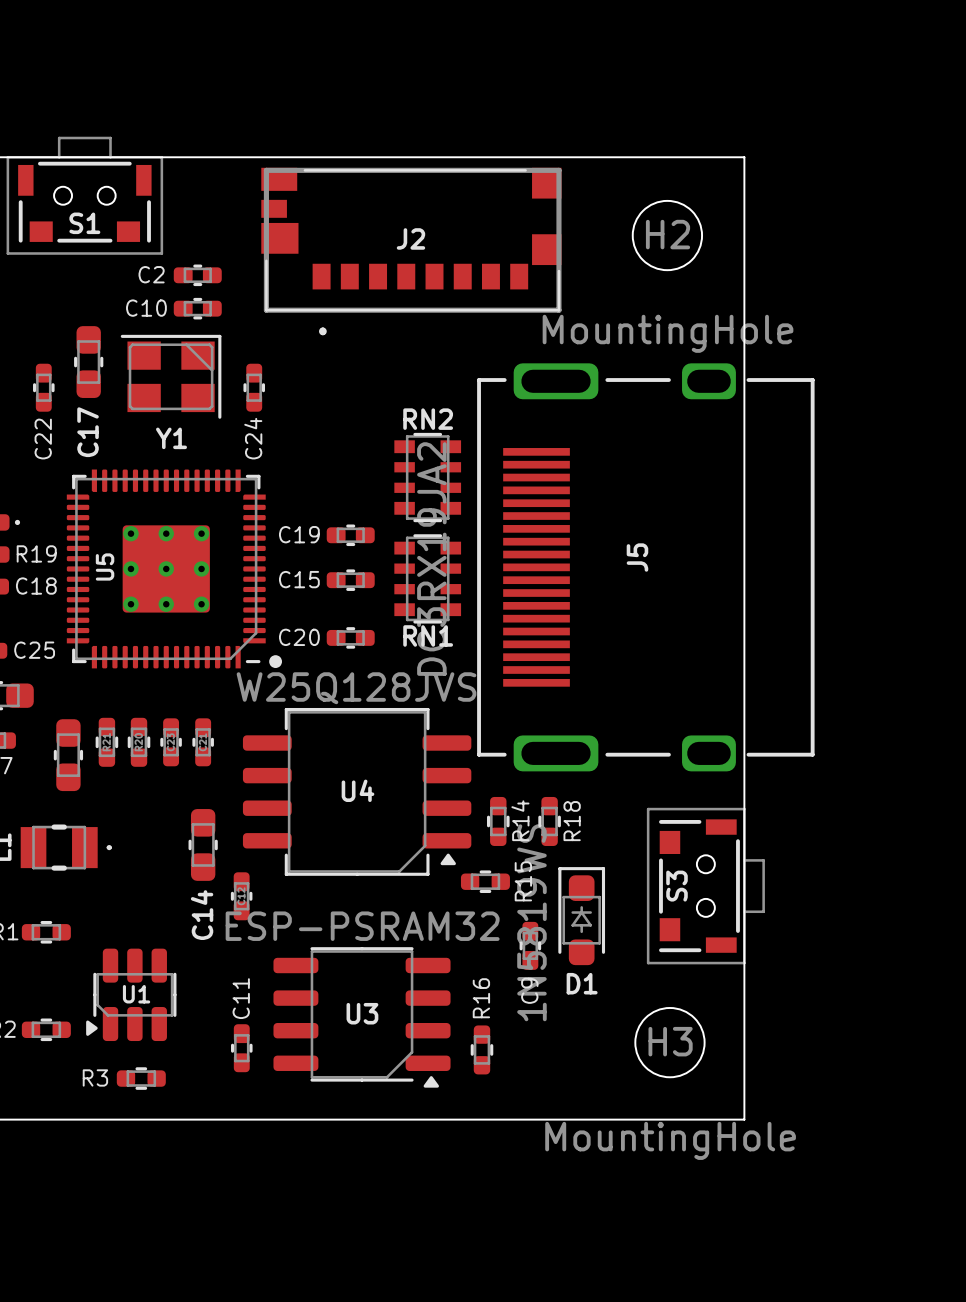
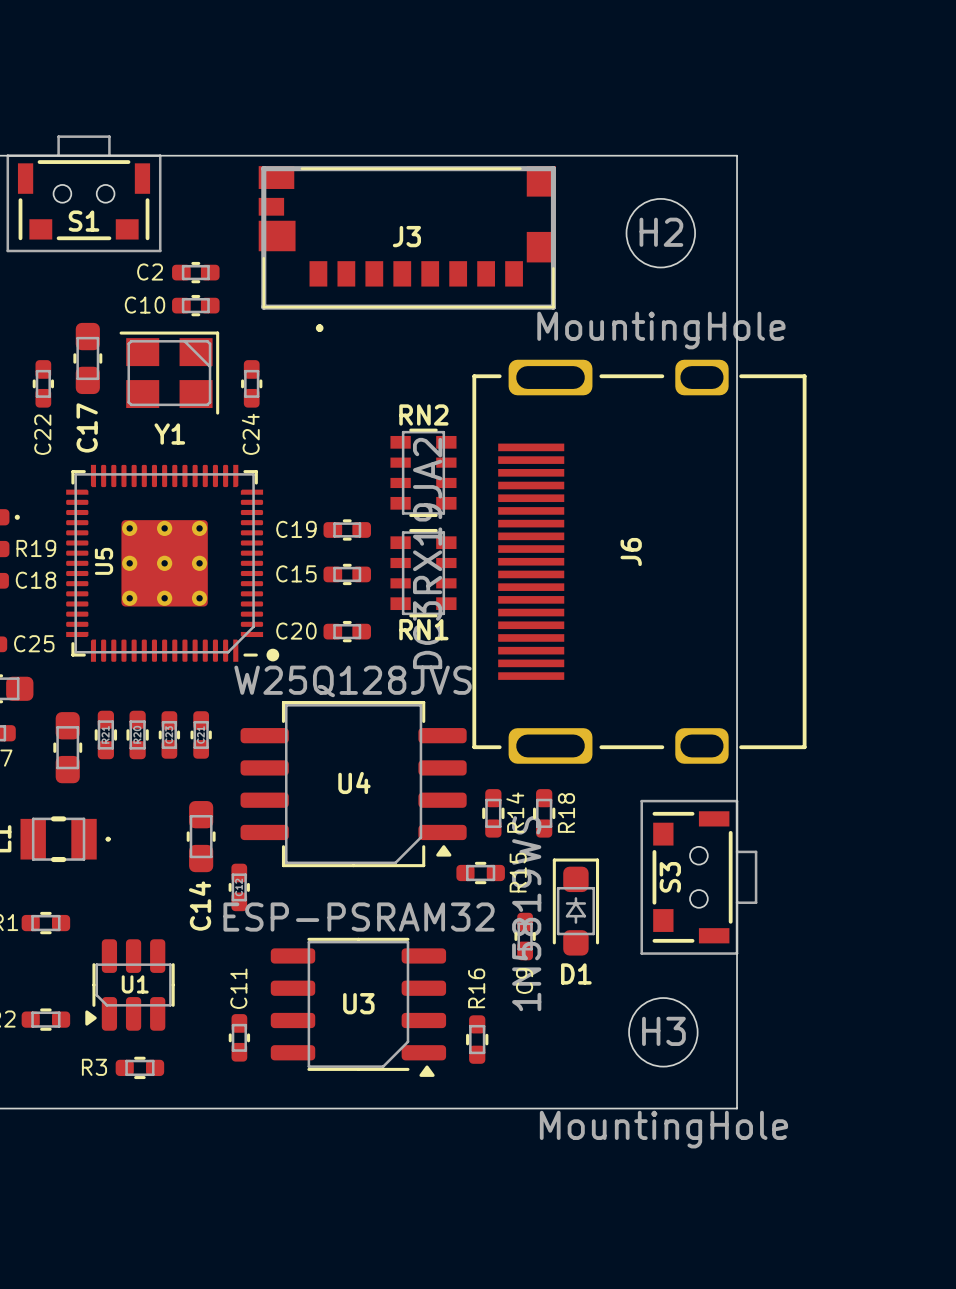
J2 name: J2 (410, 238) -> J3 (406, 236)
J5 name: J5 (637, 557) -> J6 (631, 552)

